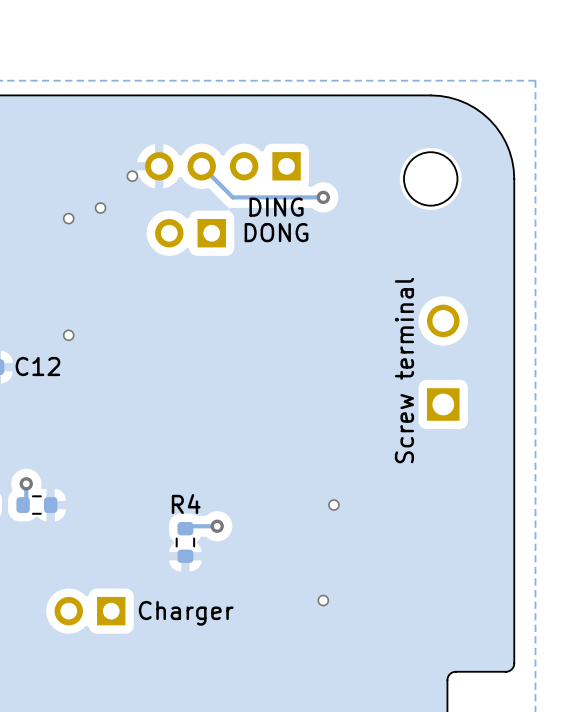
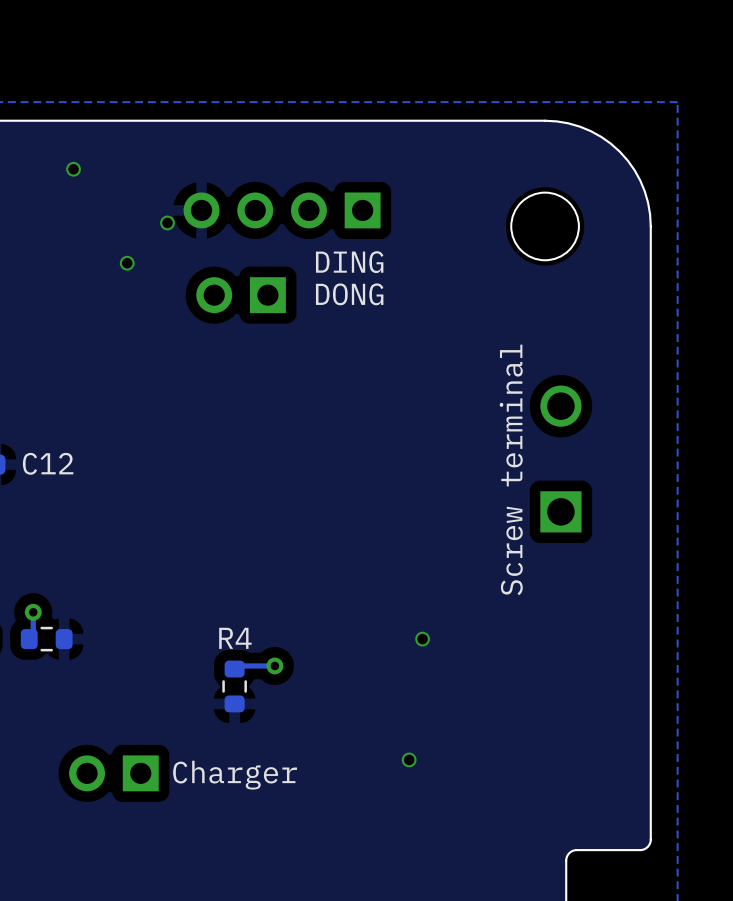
track: (201, 166) (232, 197) (323, 197) -> none
via: (323, 197) -> none
via position: (68, 218) -> (73, 169)
via: (68, 335) -> none

